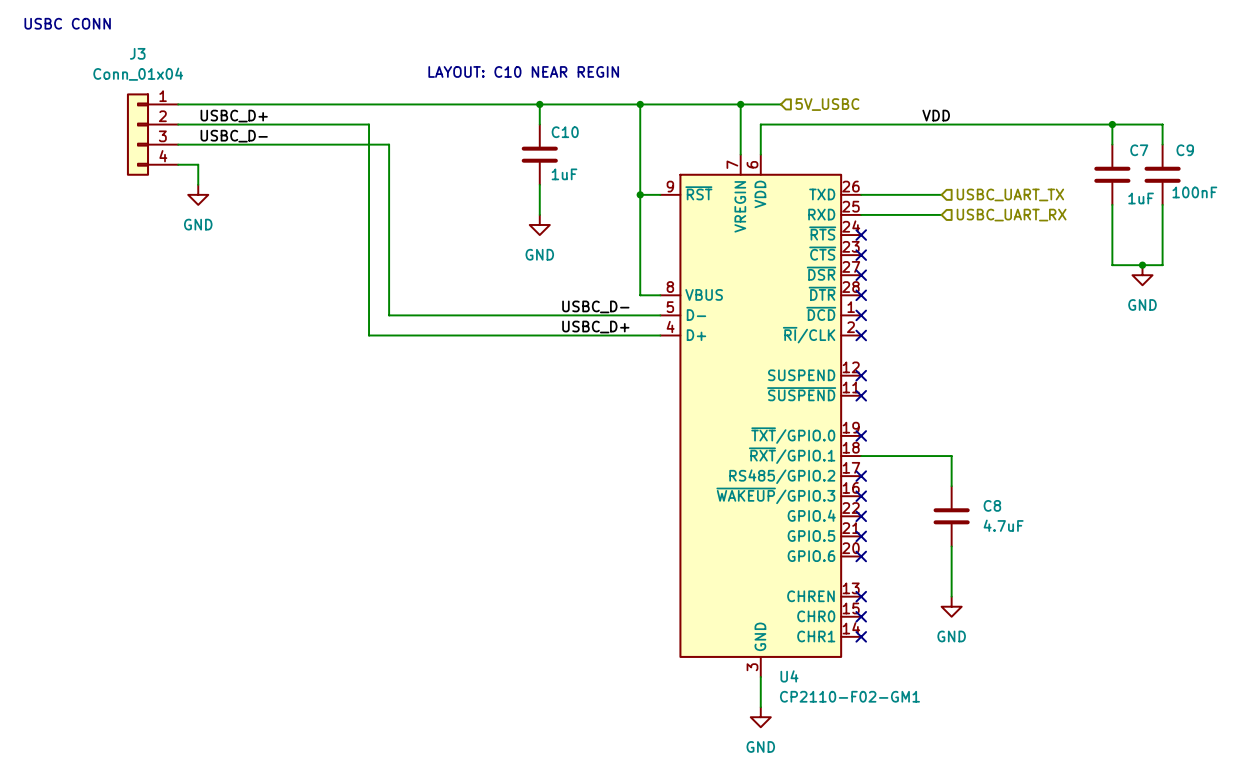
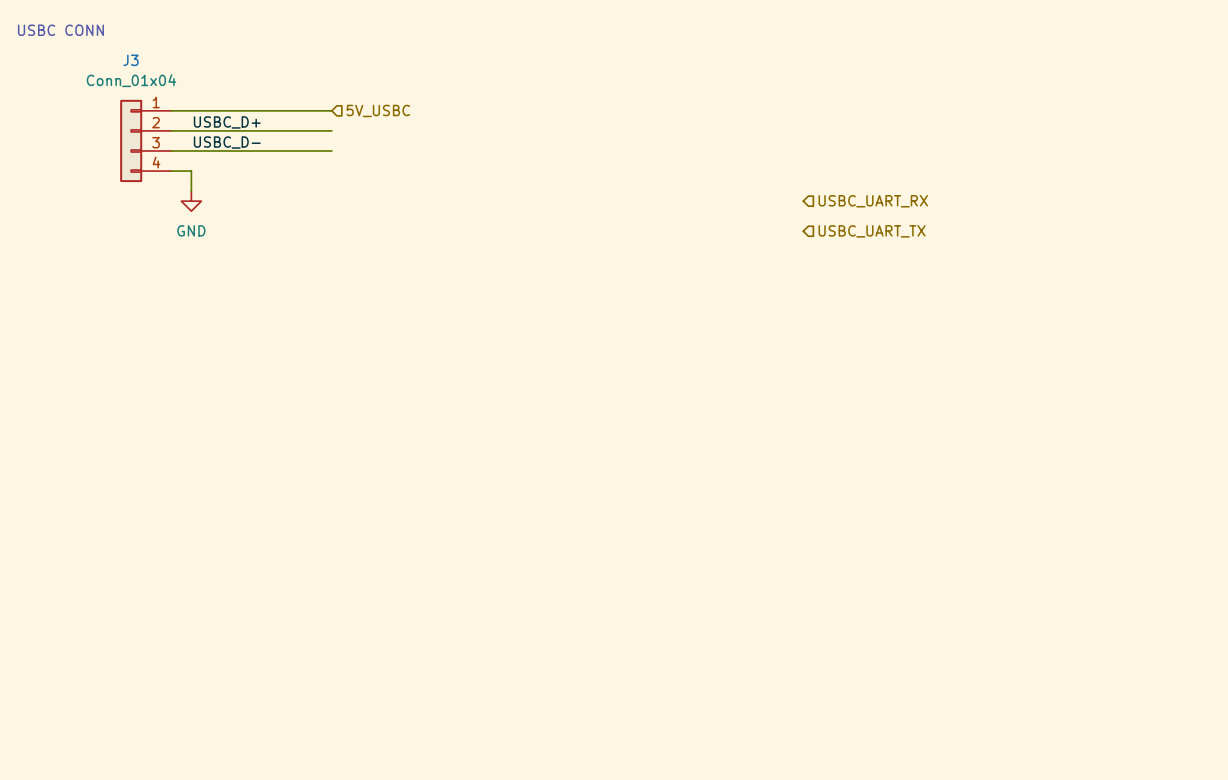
text: LAYOUT: C10 NEAR REGIN (523, 71) -> none
wire: (338, 104) (780, 104) -> none
hierarchical label: none -> 5V_USBC (378, 110)
wire: (539, 104) (539, 124) -> none
junction: (539, 104) -> none
wire: (640, 104) (640, 295) (660, 295) -> none
junction: (640, 104) -> none
wire: (740, 104) (740, 154) -> none
junction: (740, 104) -> none
hierarchical label: 5V_USBC (827, 104) -> none
label: VDD (936, 115) -> none
wire: (338, 124) (369, 124) (369, 335) (660, 335) -> none
wire: (1112, 124) (1112, 144) -> none
junction: (1112, 124) -> none
wire: (338, 144) (389, 144) (389, 315) (660, 315) -> none
wire: (1162, 144) (1162, 124) (760, 124) (760, 154) -> none
C10: 1uF (539, 154) -> none
C7: 1uF (1112, 174) -> none
C9: 100nF (1162, 174) -> none
wire: (539, 184) (539, 214) -> none
wire: (640, 194) (660, 194) -> none
junction: (640, 194) -> none
wire: (861, 194) (941, 194) -> none
hierarchical label position: USBC_UART_TX (1010, 194) -> USBC_UART_TX (872, 231)
wire: (1112, 204) (1112, 265) (1162, 265) (1162, 204) -> none
wire: (861, 214) (941, 214) -> none
hierarchical label position: USBC_UART_RX (1011, 215) -> USBC_UART_RX (873, 201)
power symbol: GND (539, 224) -> none
no-connect mark: (861, 235) -> none
no-connect mark: (861, 255) -> none
junction: (1142, 265) -> none
no-connect mark: (861, 275) -> none
power symbol: GND (1142, 275) -> none
no-connect mark: (861, 295) -> none
label: USBC_D- (595, 306) -> none
no-connect mark: (861, 315) -> none
label: USBC_D+ (595, 327) -> none
no-connect mark: (861, 335) -> none
no-connect mark: (861, 375) -> none
no-connect mark: (861, 395) -> none
U4: CP2110-F02-GM1 (760, 415) -> none
no-connect mark: (861, 435) -> none
wire: (861, 456) (951, 456) (951, 486) -> none
no-connect mark: (861, 476) -> none
no-connect mark: (861, 496) -> none
no-connect mark: (861, 516) -> none
C8: 4.7uF (951, 516) -> none
no-connect mark: (861, 536) -> none
wire: (951, 546) (951, 596) -> none
no-connect mark: (861, 556) -> none
no-connect mark: (861, 596) -> none
power symbol: GND (951, 606) -> none
no-connect mark: (861, 616) -> none
no-connect mark: (861, 636) -> none
wire: (760, 677) (760, 707) -> none
power symbol: GND (760, 717) -> none

